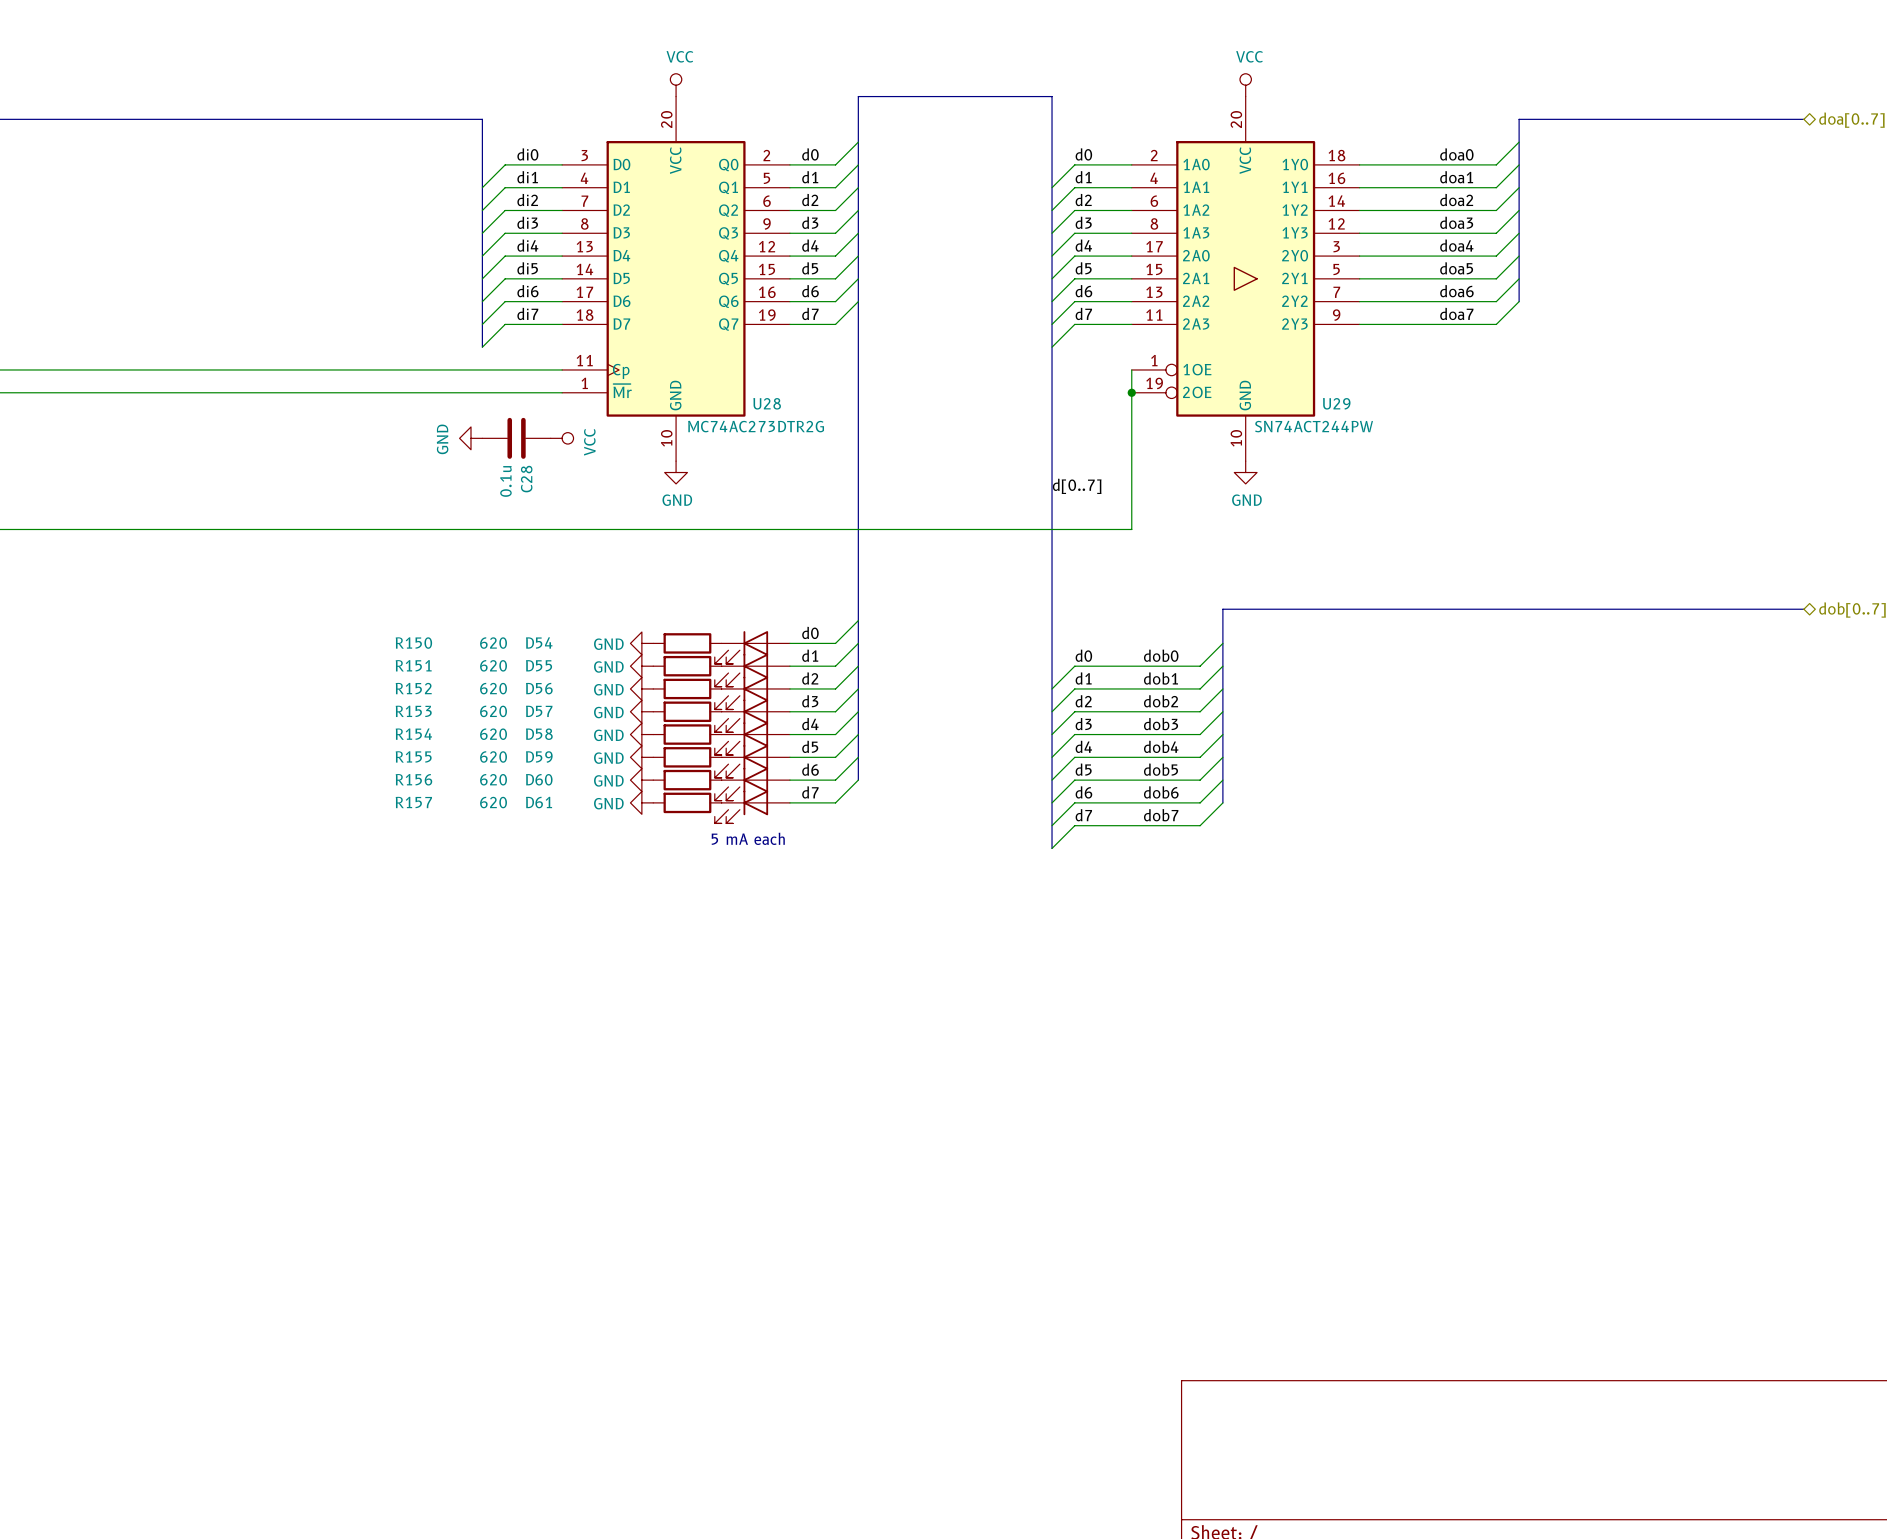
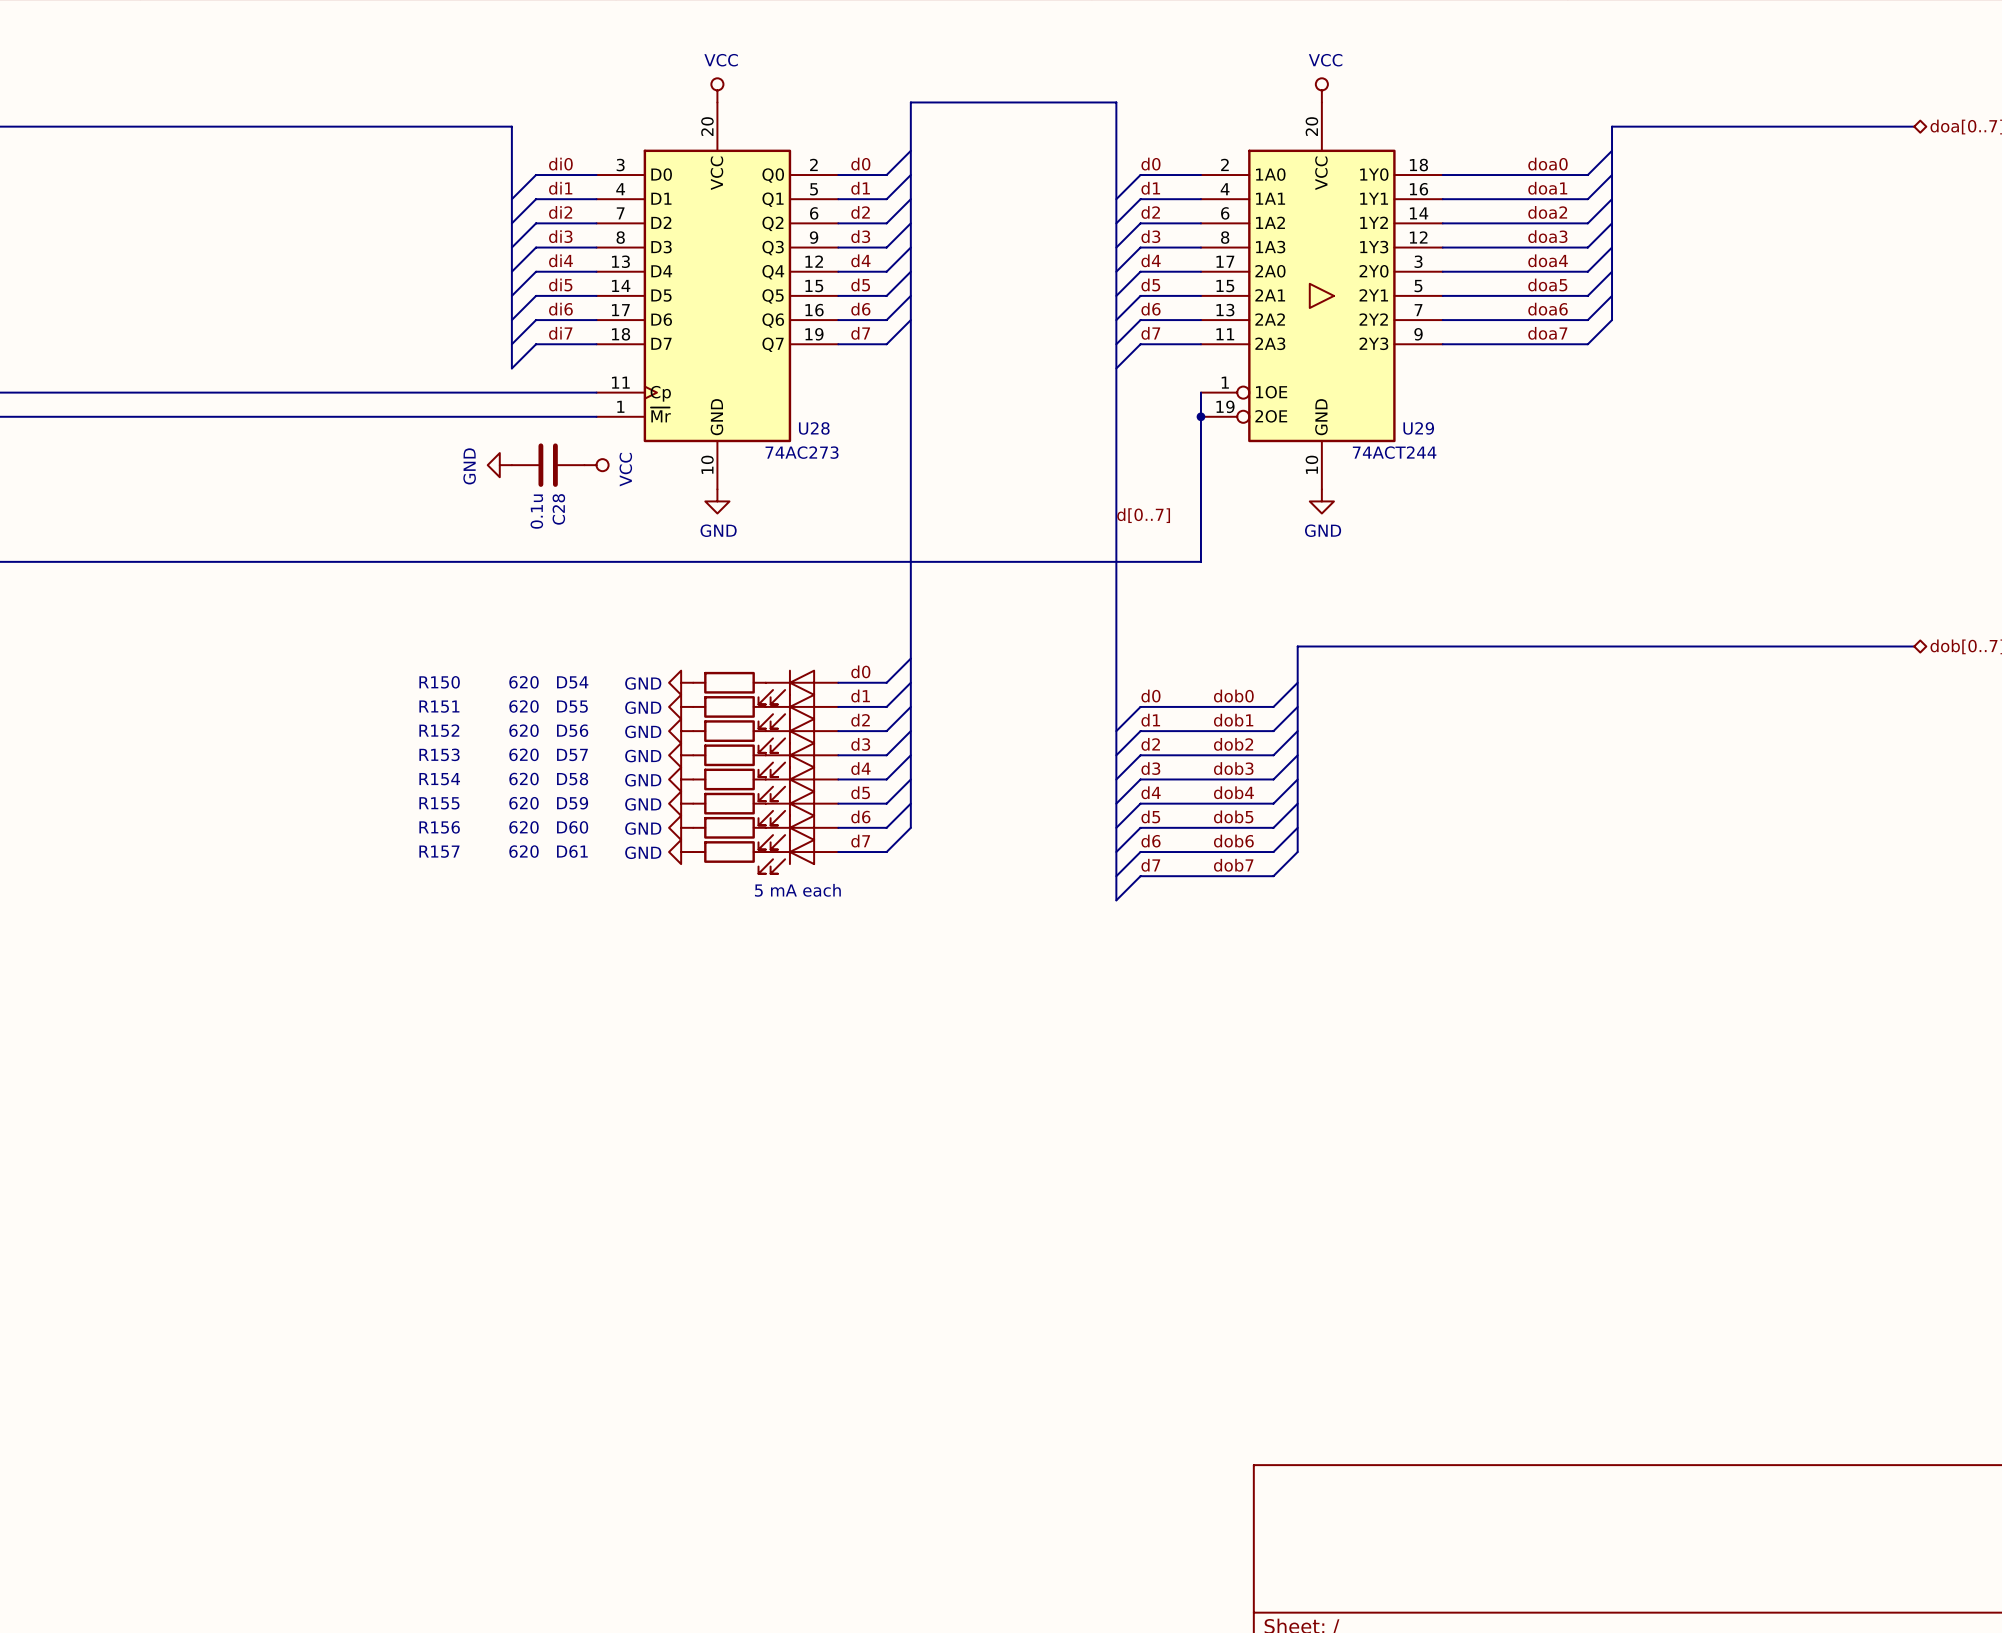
U28 value: MC74AC273DTR2G (756, 426) -> 74AC273 (802, 452)
U29 value: SN74ACT244PW (1314, 426) -> 74ACT244 (1394, 452)

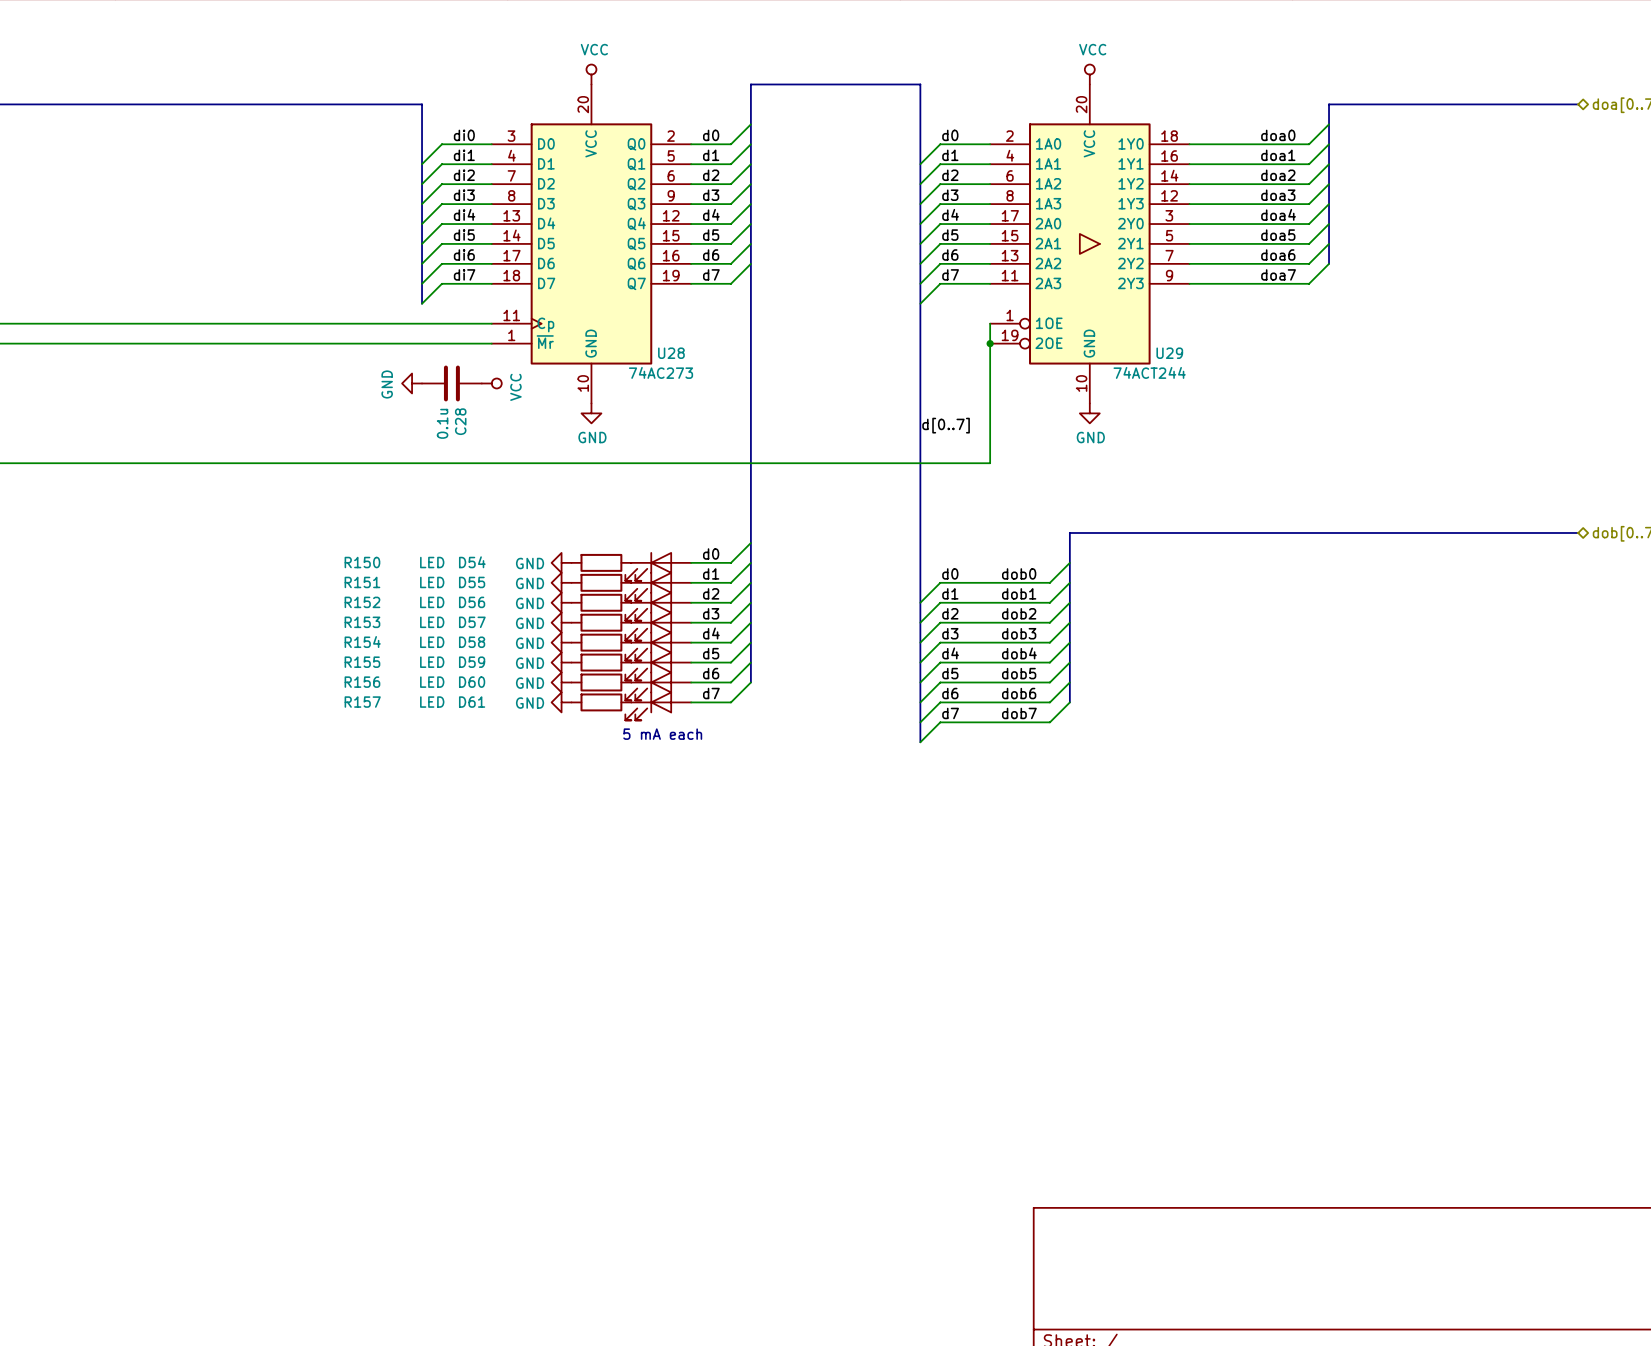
R150 value: 620 (524, 682) -> LED (432, 562)
R151 value: 620 (524, 706) -> LED (432, 582)
R152 value: 620 (524, 730) -> LED (432, 602)
R153 value: 620 (524, 754) -> LED (432, 622)
R154 value: 620 (524, 779) -> LED (432, 642)
R155 value: 620 (524, 803) -> LED (432, 662)
R156 value: 620 (524, 827) -> LED (432, 682)
R157 value: 620 (524, 851) -> LED (432, 702)

